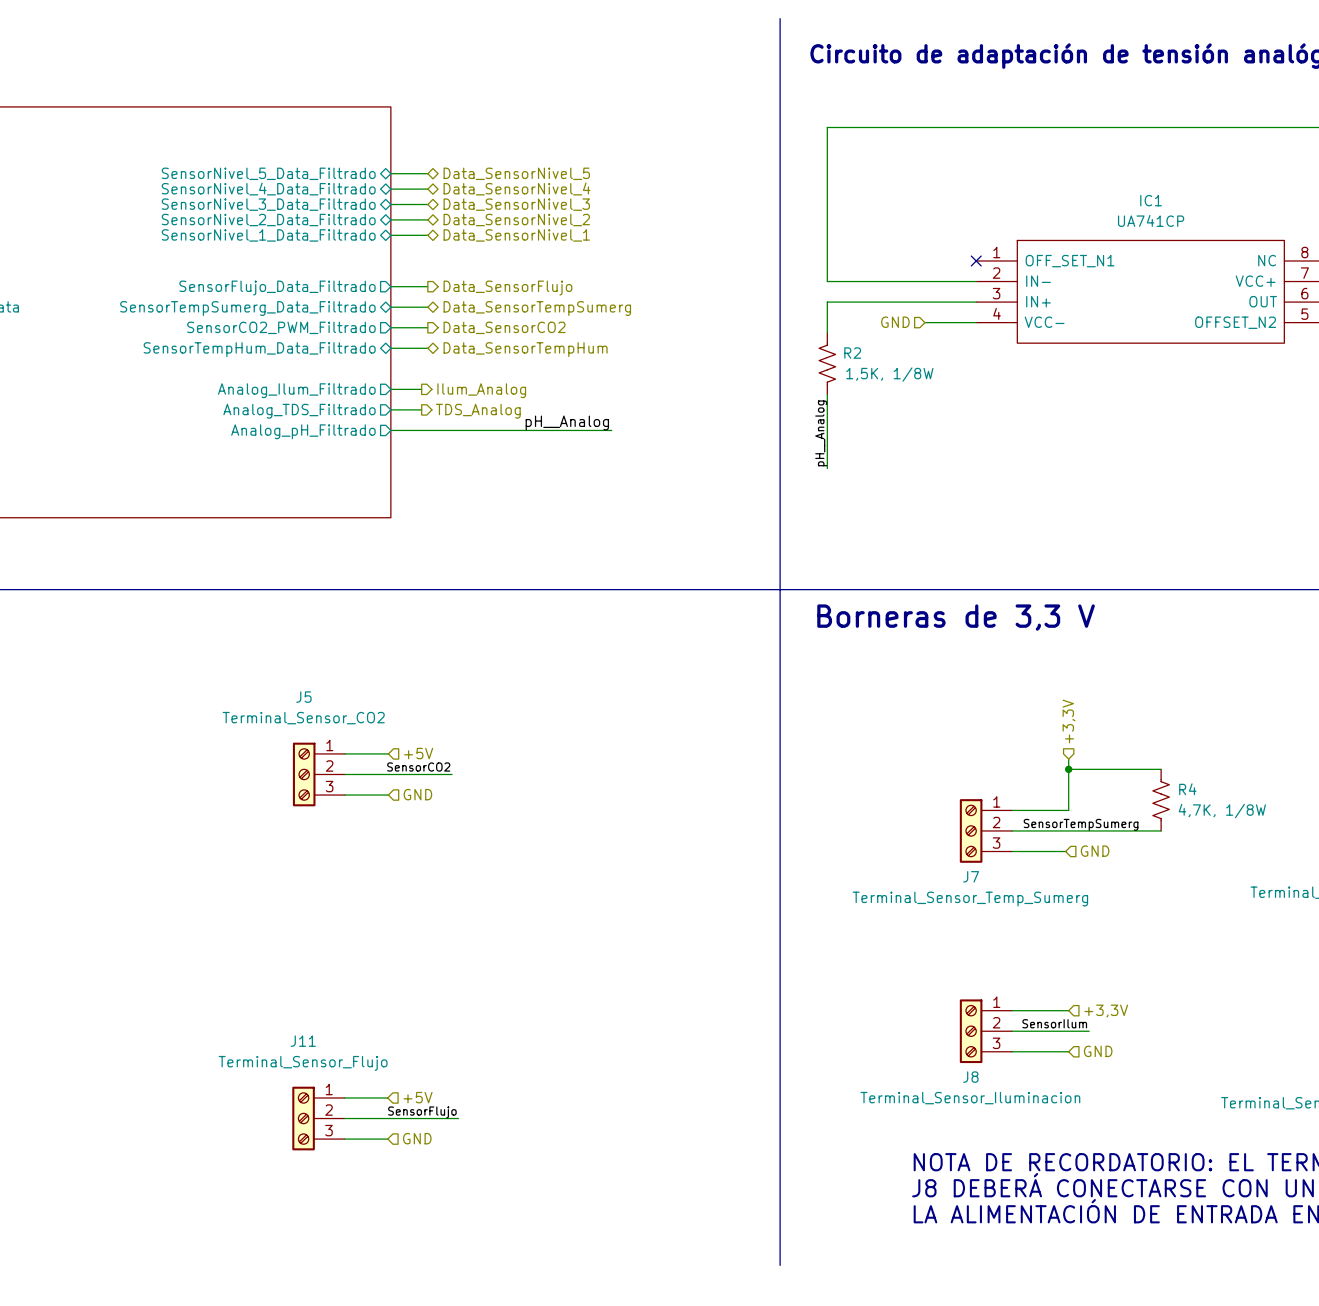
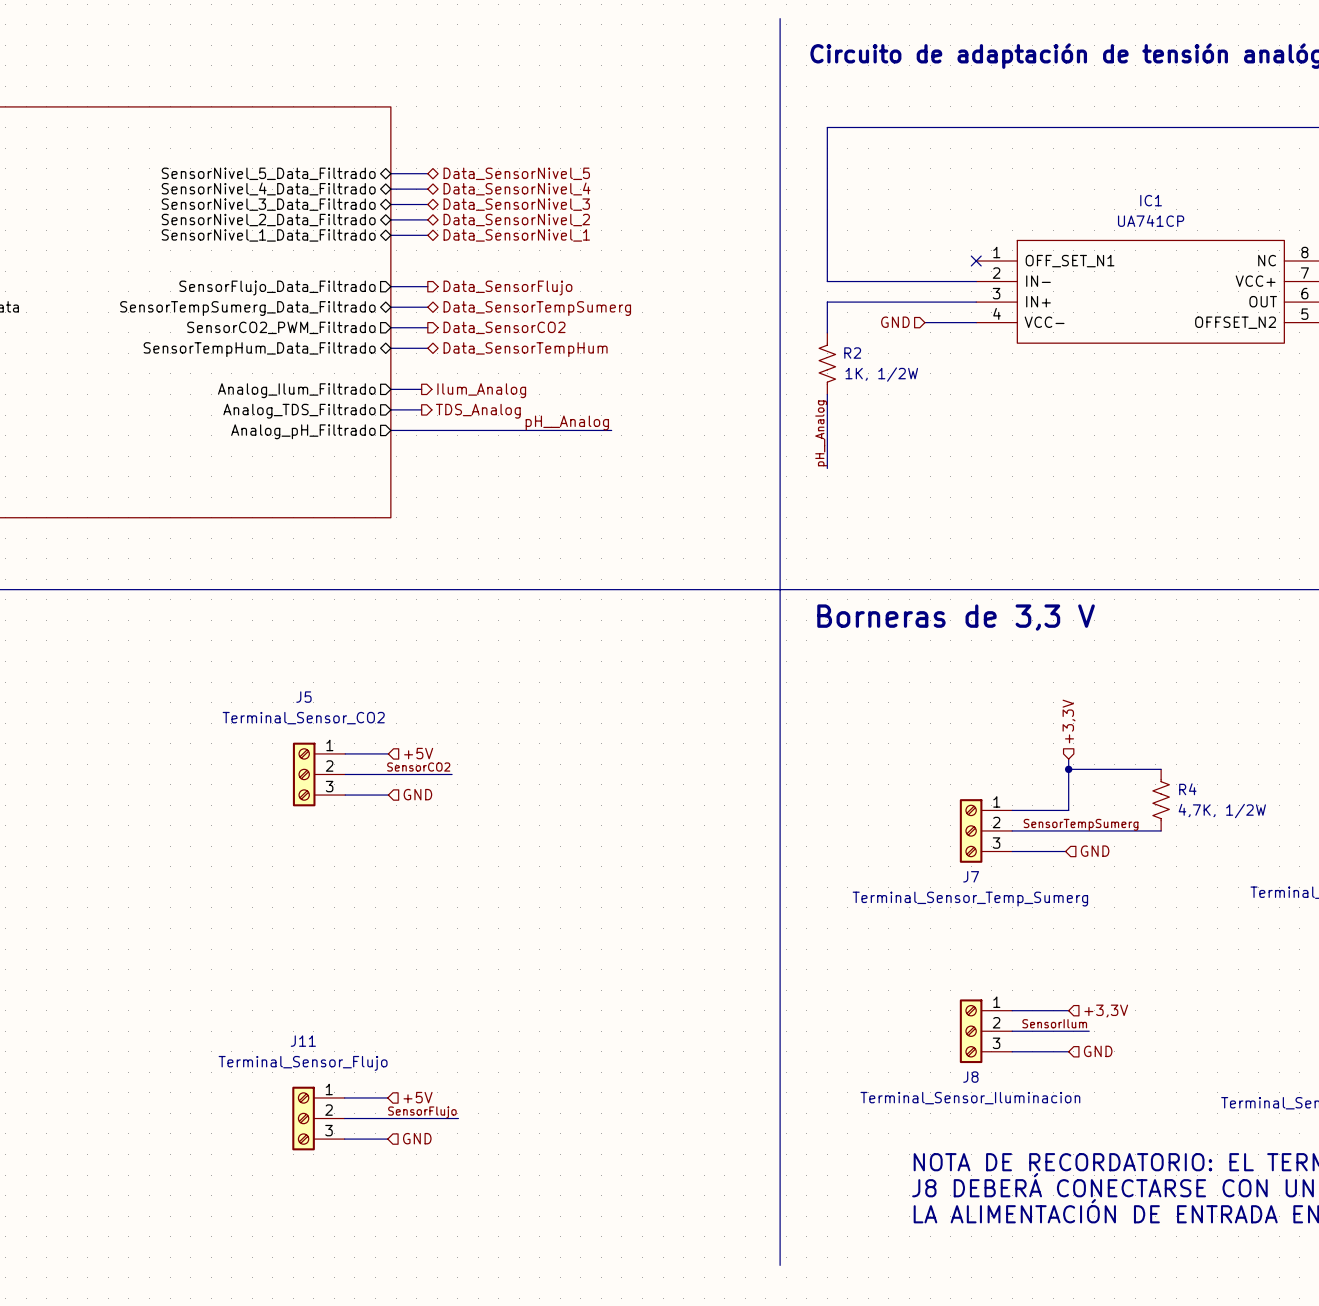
R2 value: 1,5K, 1/8W (889, 374) -> 1K, 1/2W (881, 374)
R4 value: 4,7K, 1/8W (1222, 811) -> 4,7K, 1/2W (1222, 811)

